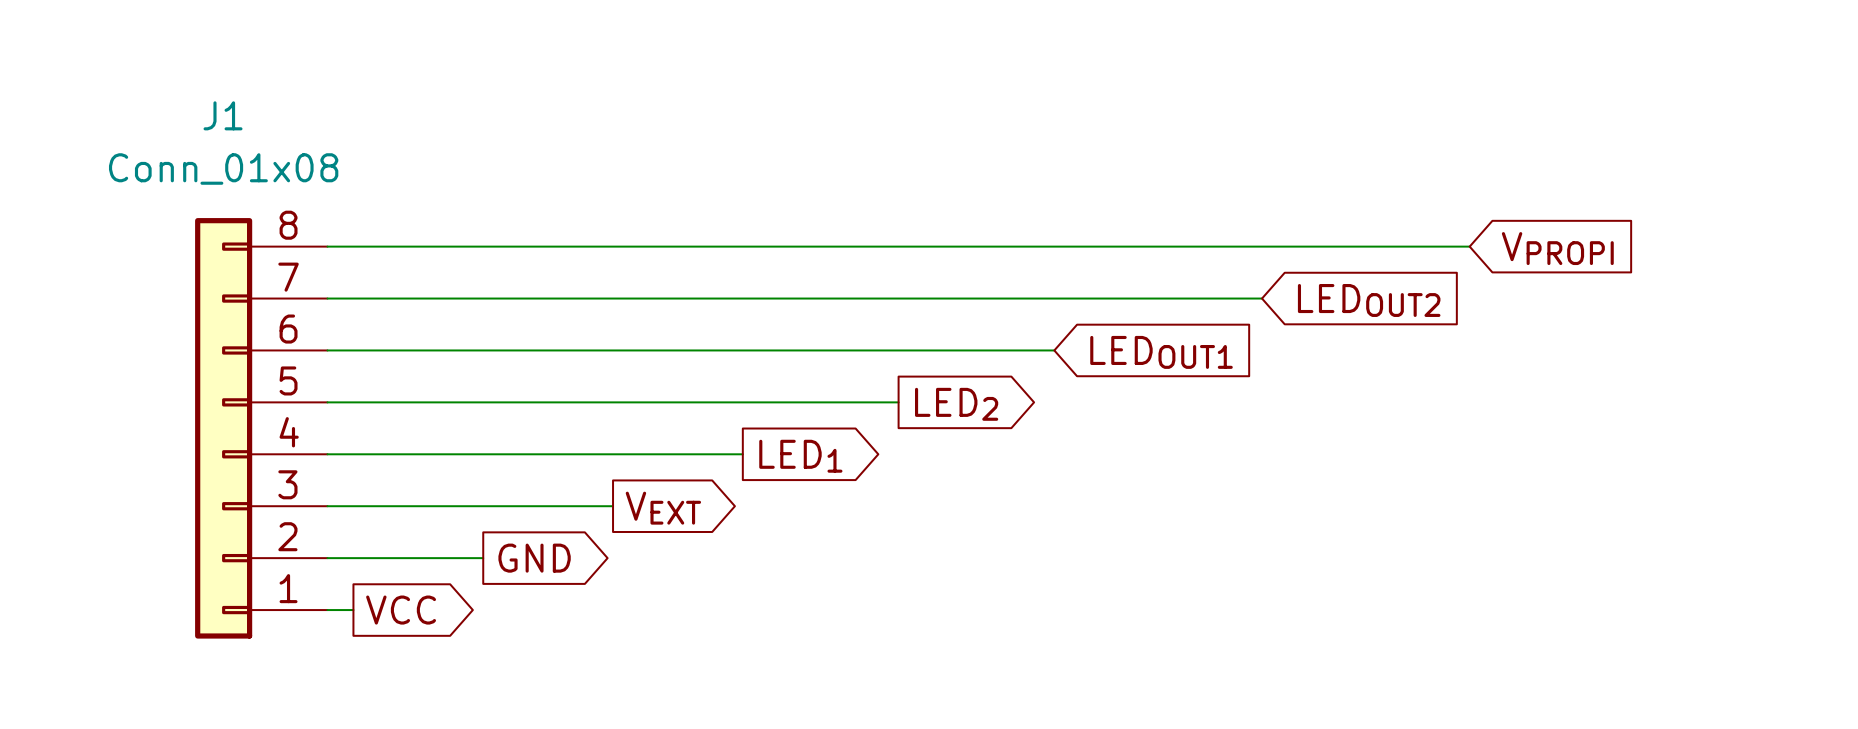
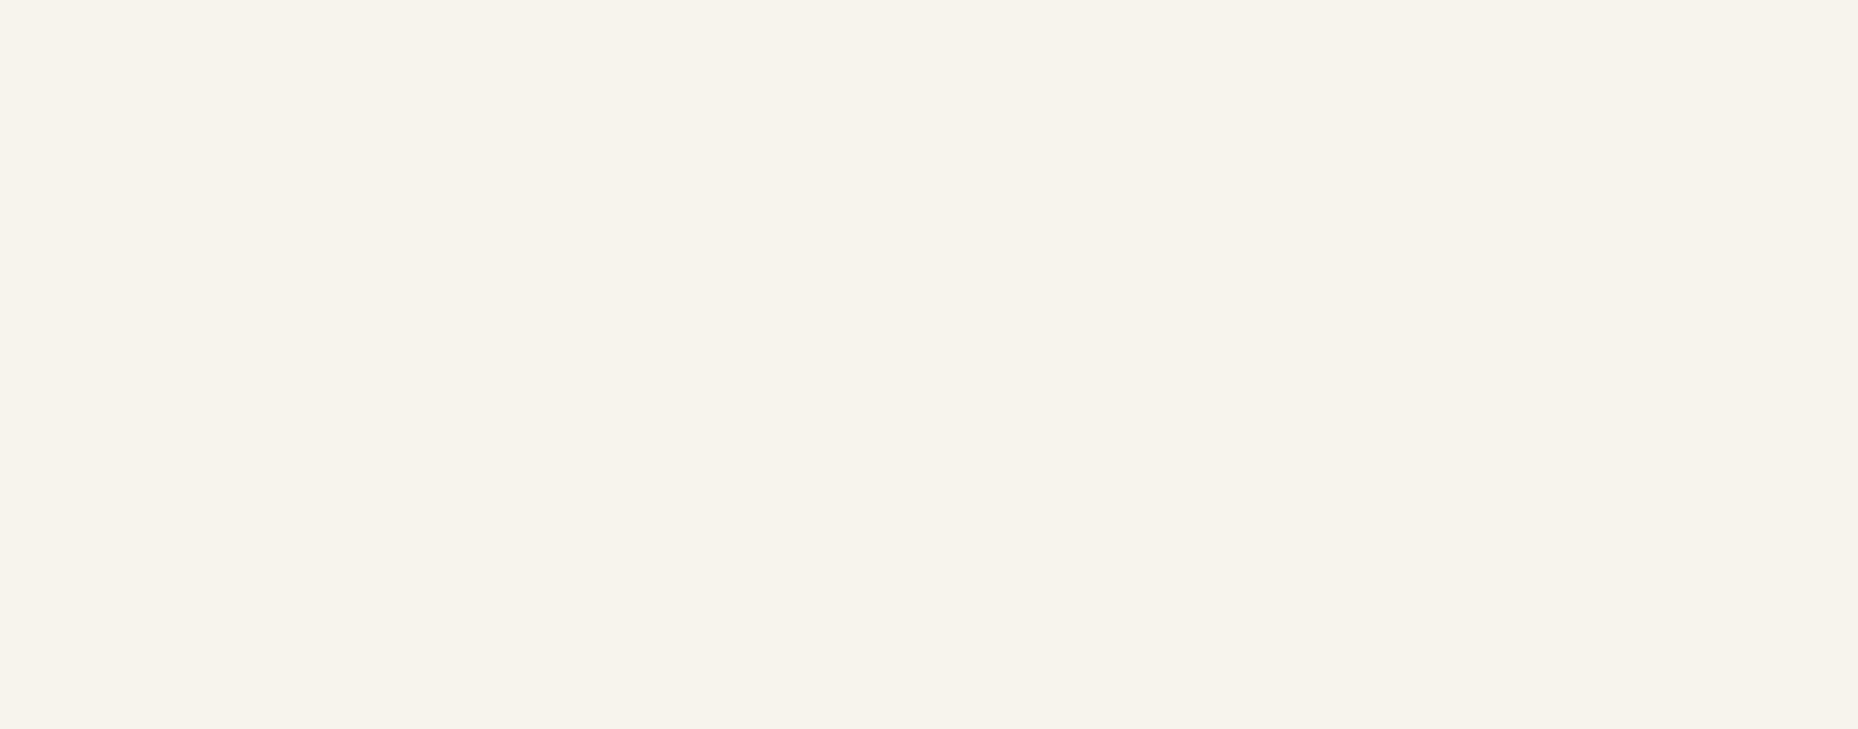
wire: (327, 246) (1469, 246) -> none
global label: VPROPI (1557, 248) -> none
wire: (327, 298) (1262, 298) -> none
global label: LEDOUT2 (1369, 300) -> none
wire: (327, 350) (1054, 350) -> none
global label: LEDOUT1 (1161, 352) -> none
wire: (327, 402) (898, 402) -> none
global label: LED2 (956, 404) -> none
J1: Conn_01x08 (261, 428) -> none
wire: (327, 454) (742, 454) -> none
global label: LED1 (800, 456) -> none
wire: (327, 506) (613, 506) -> none
global label: VEXT (663, 508) -> none
wire: (327, 558) (483, 558) -> none
global label: GND (534, 558) -> none
wire: (327, 610) (353, 610) -> none
global label: VCC (401, 610) -> none

